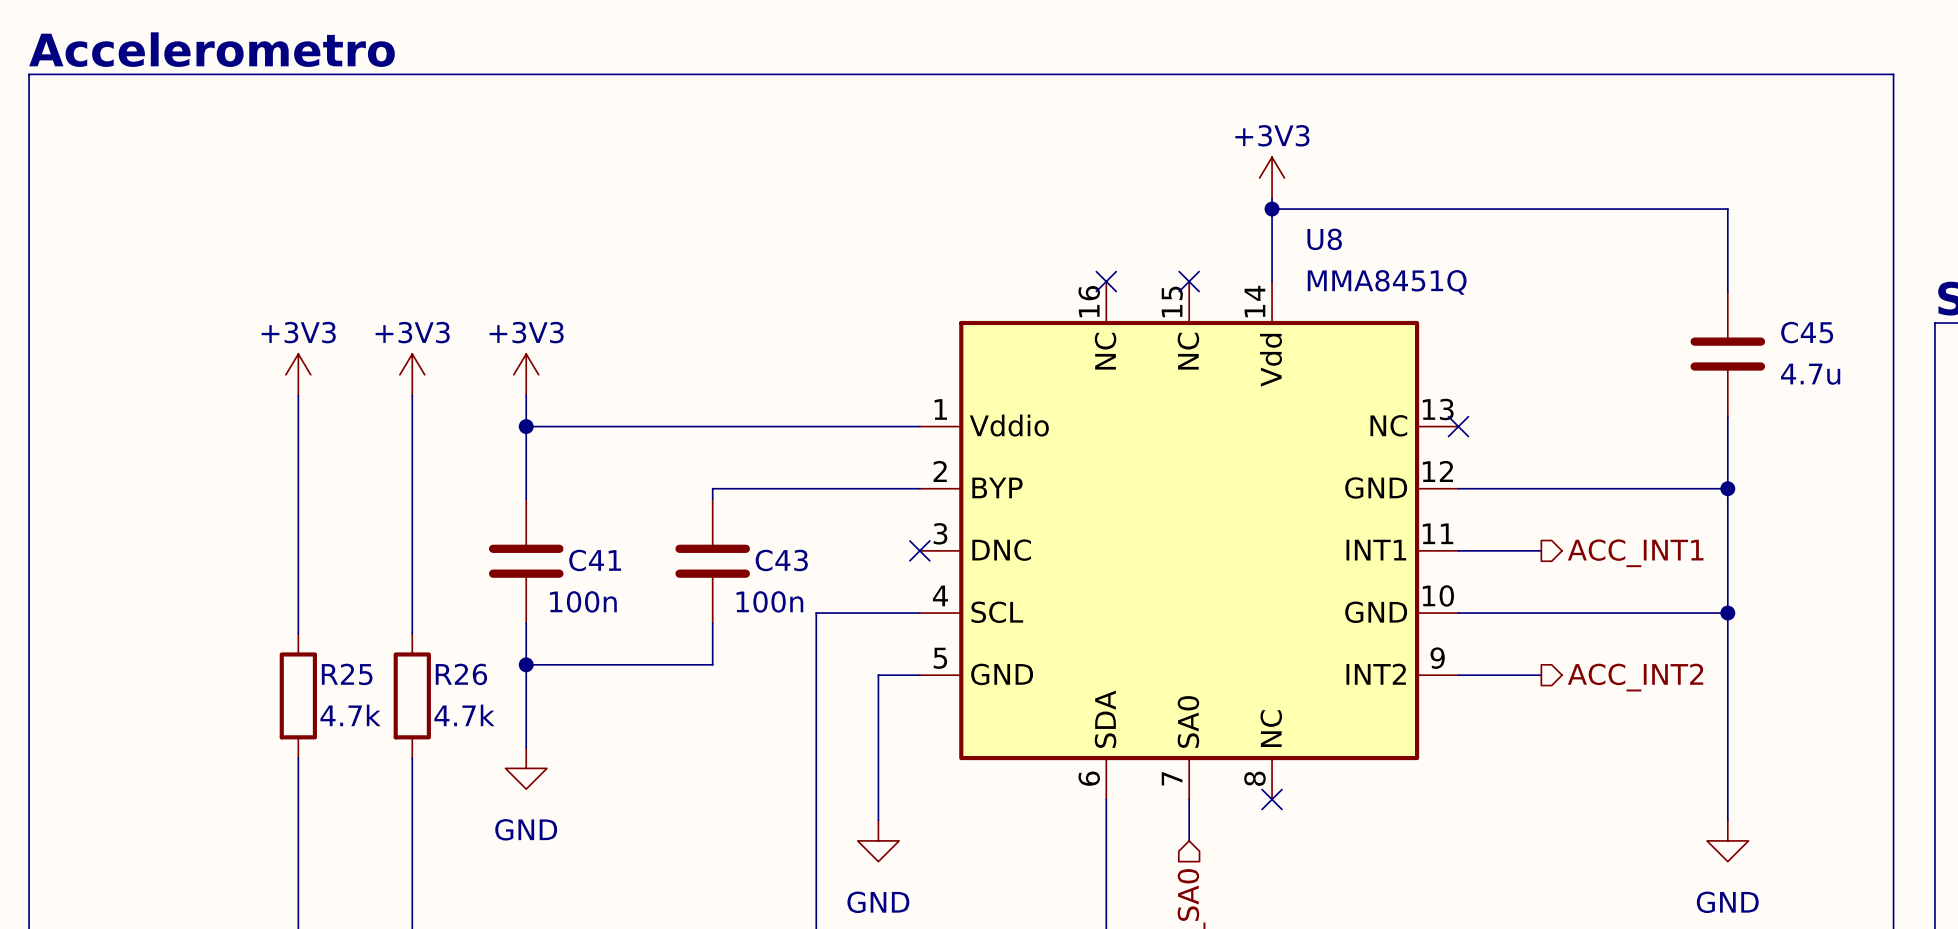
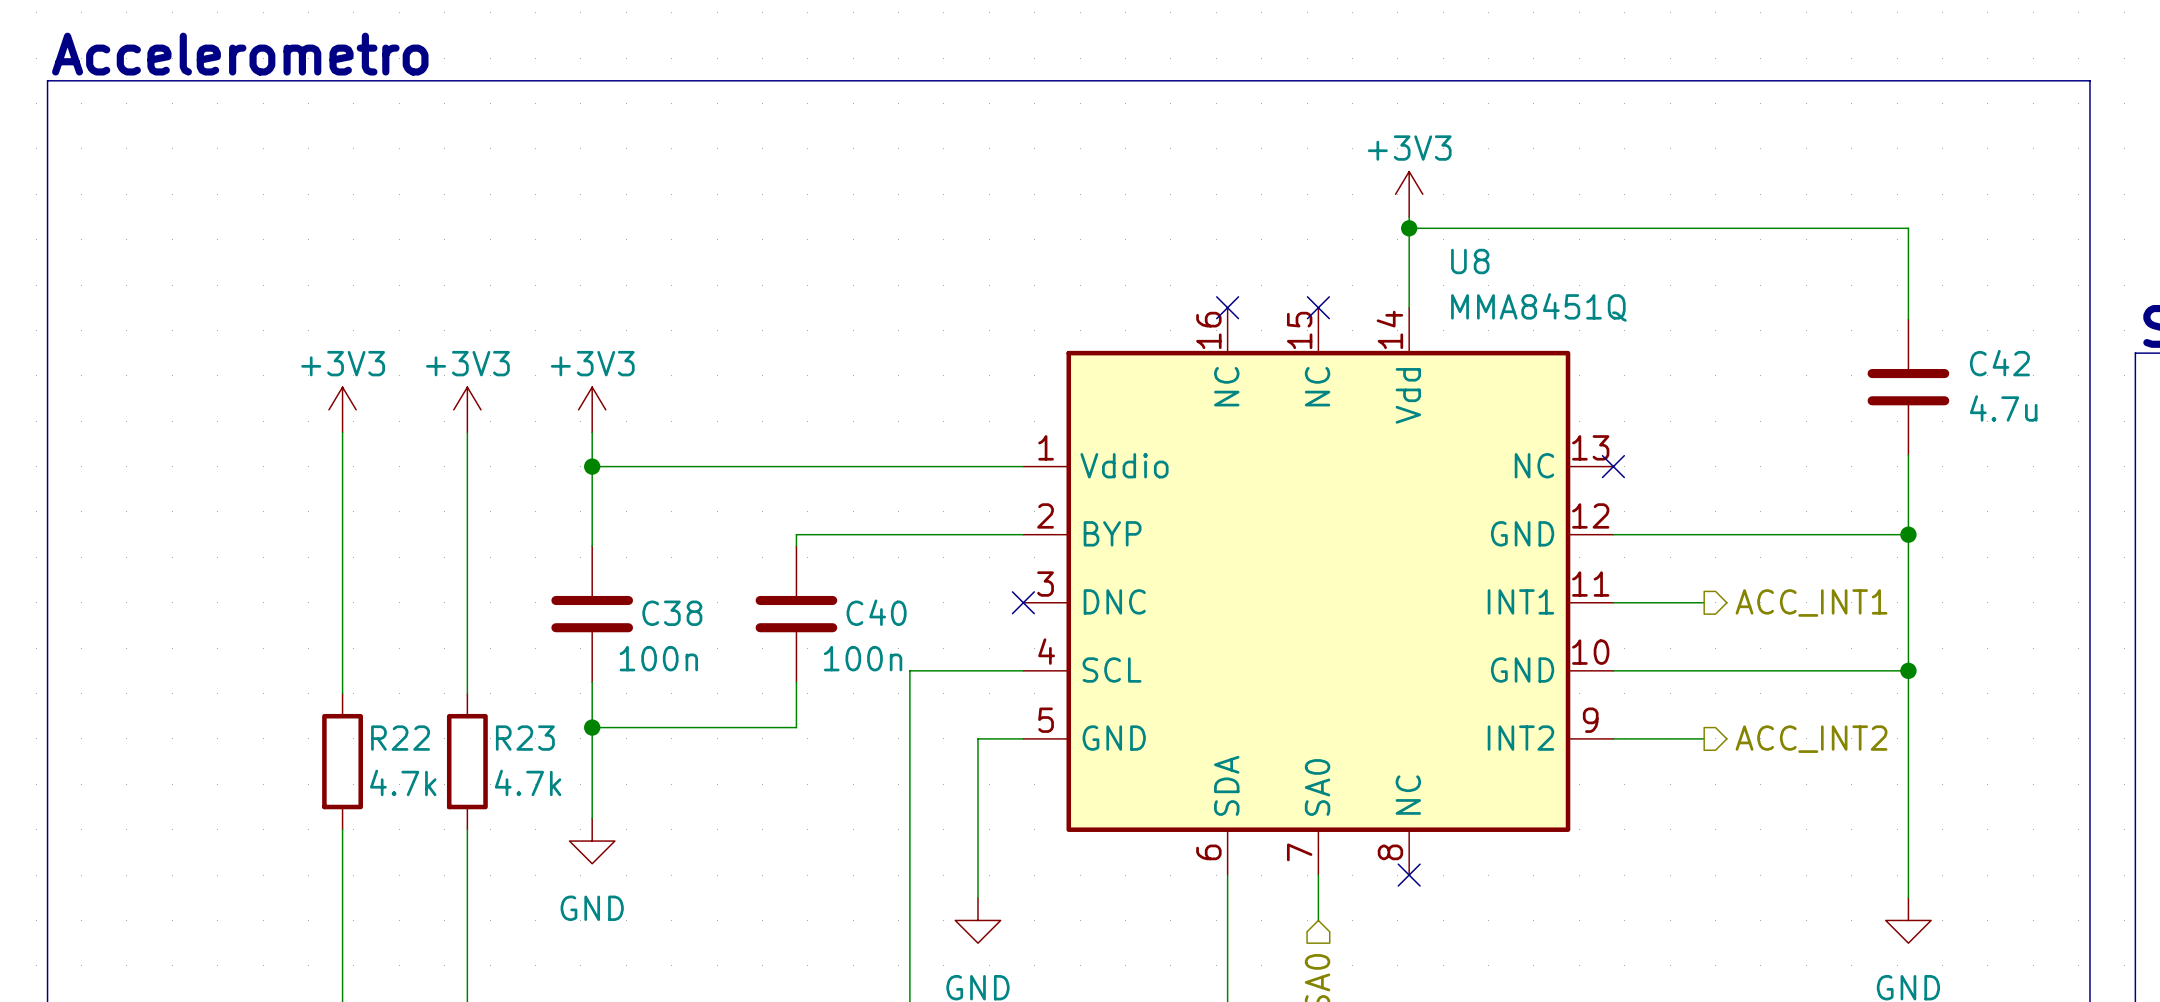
C45 name: C45 (1807, 332) -> C42 (1999, 363)
C41 name: C41 (595, 560) -> C38 (672, 613)
C43 name: C43 (781, 560) -> C40 (876, 612)
R25 name: R25 (347, 674) -> R22 (400, 738)
R26 name: R26 (461, 674) -> R23 (525, 738)

